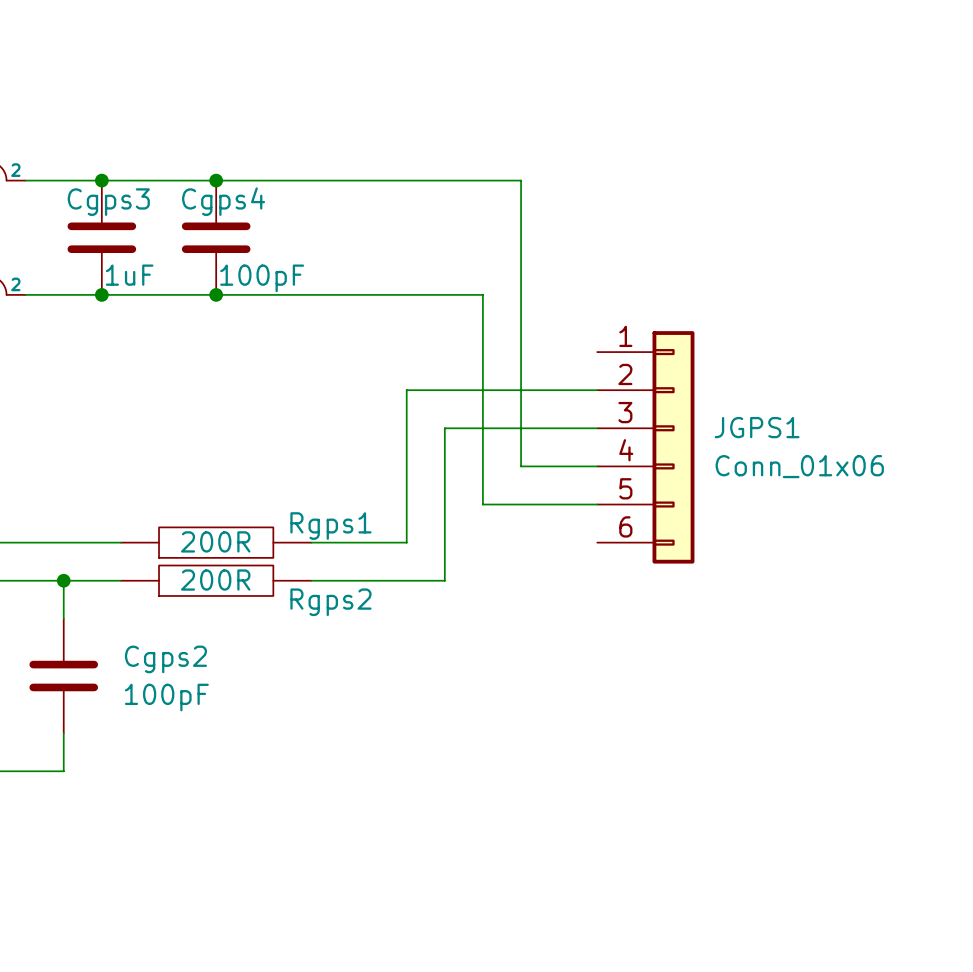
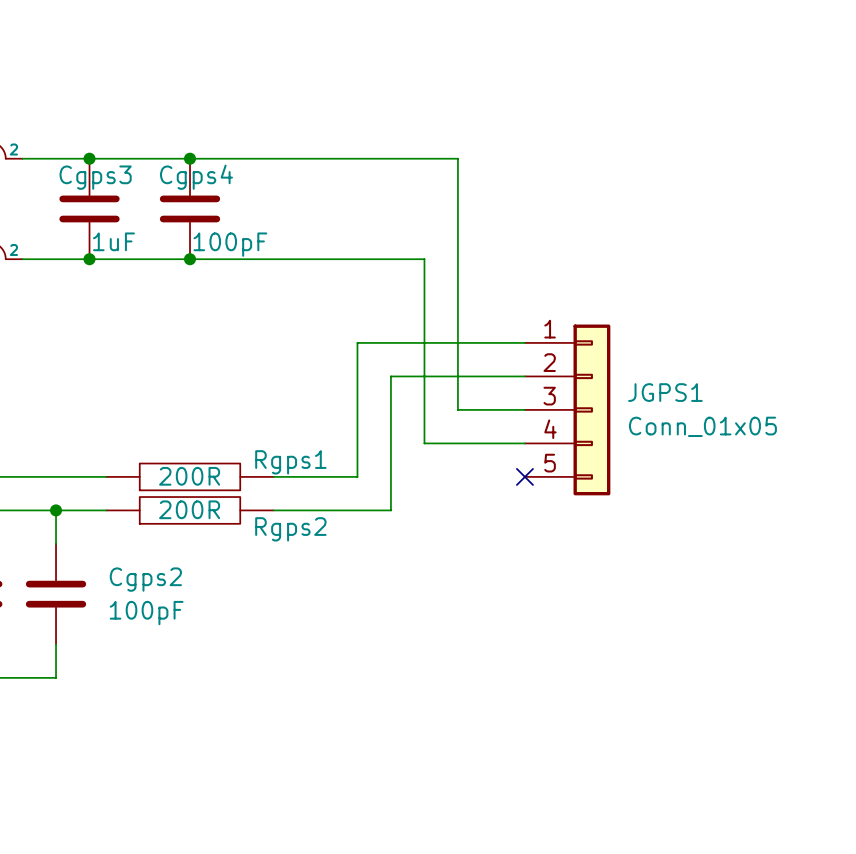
JGPS1 symbol: [597, 331, 695, 564] -> [524, 324, 611, 496]
JGPS1 value: Conn_01x06 (799, 466) -> Conn_01x05 (702, 426)
no-connect mark: none -> (524, 476)

